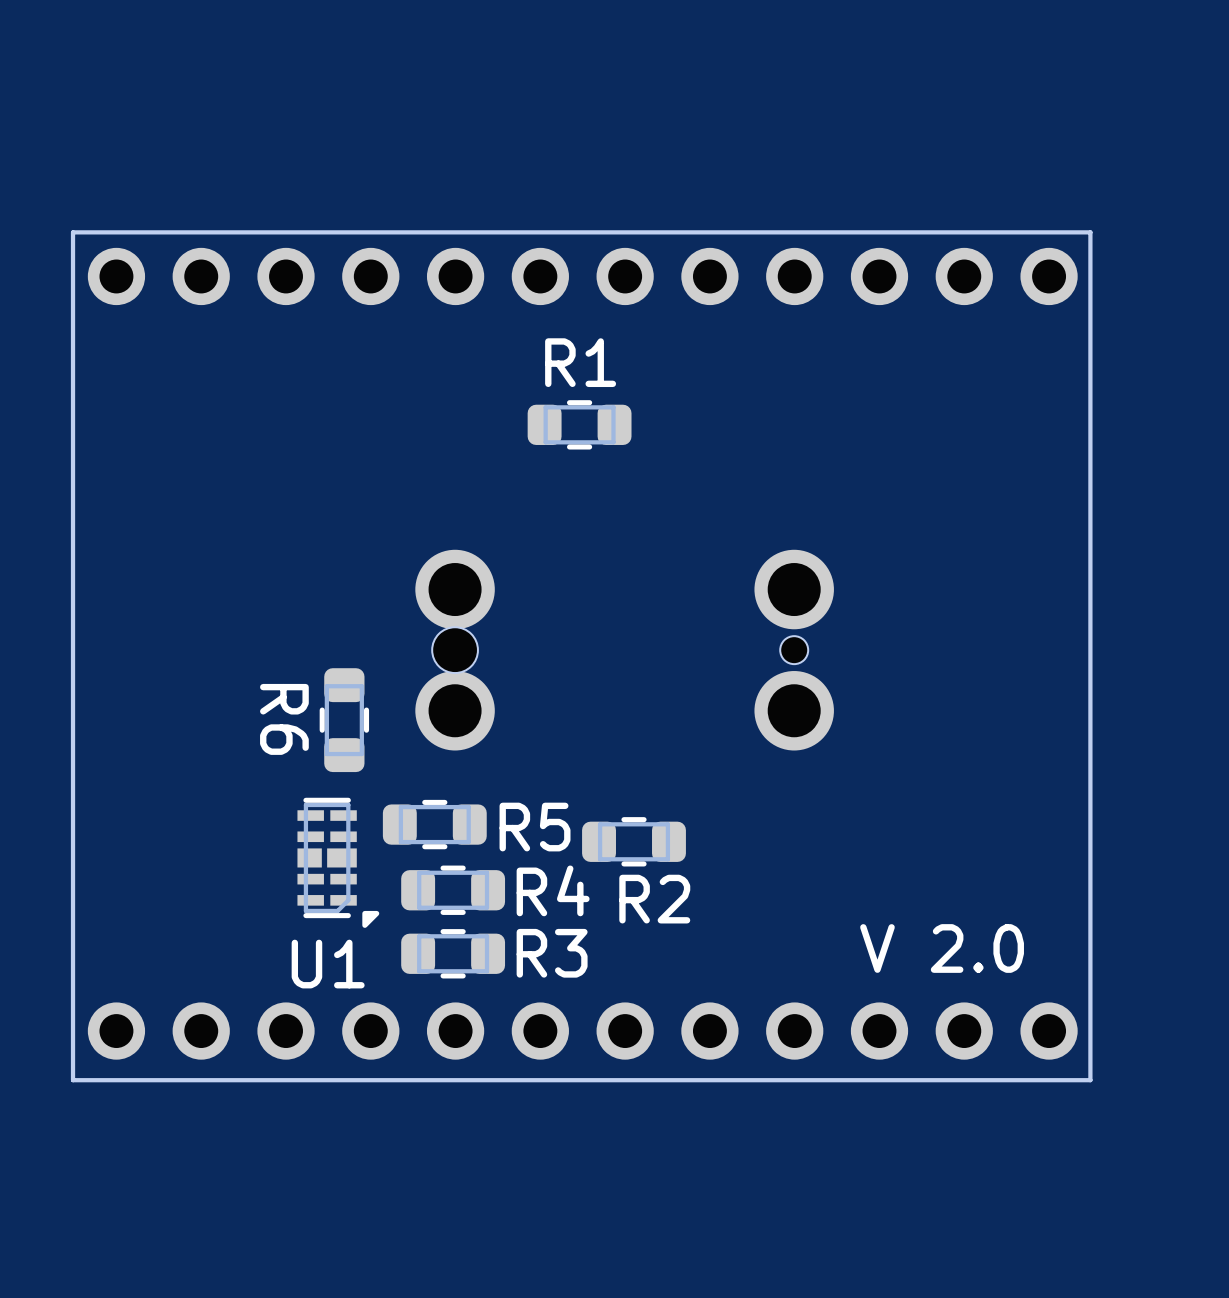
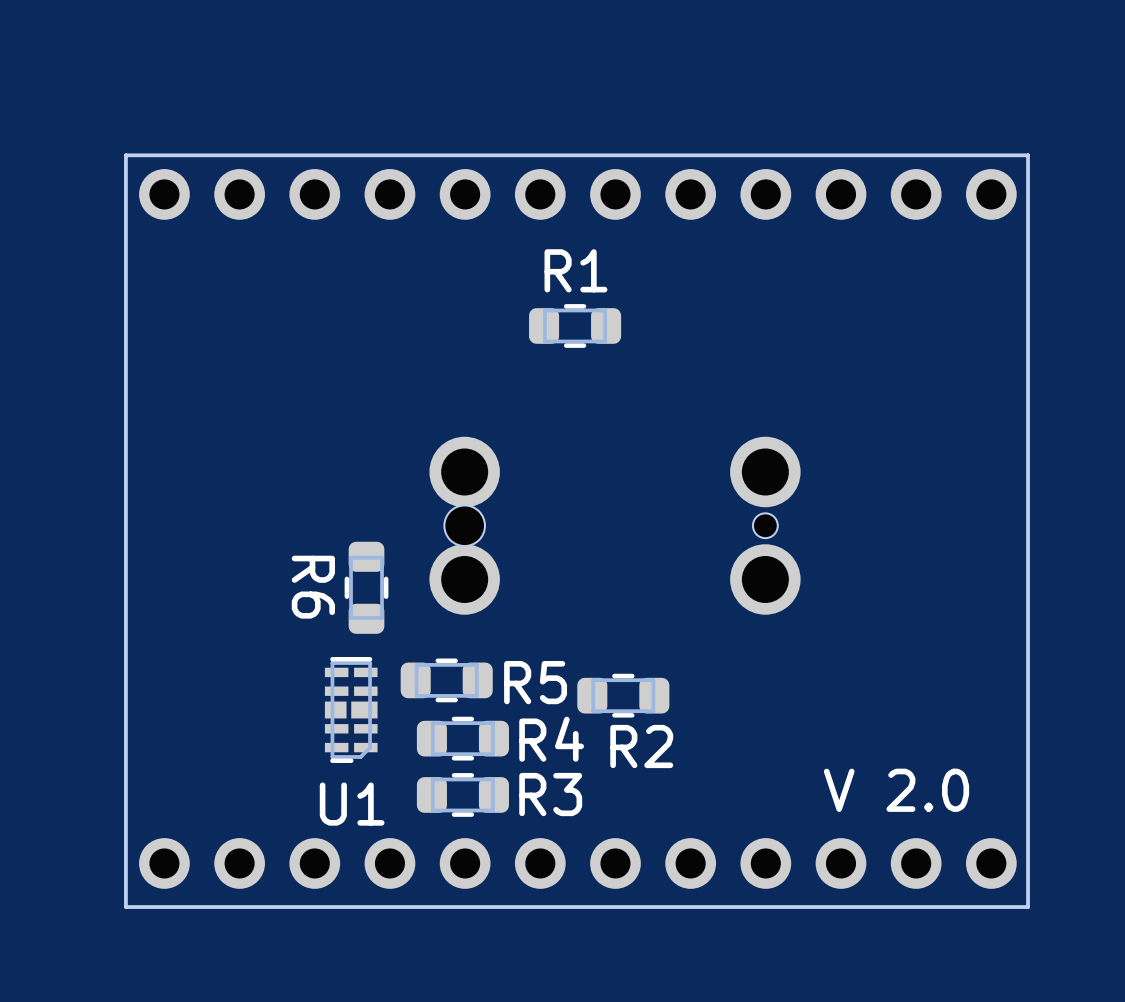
U1 footprint: [297, 797, 380, 928] -> [324, 657, 378, 763]

